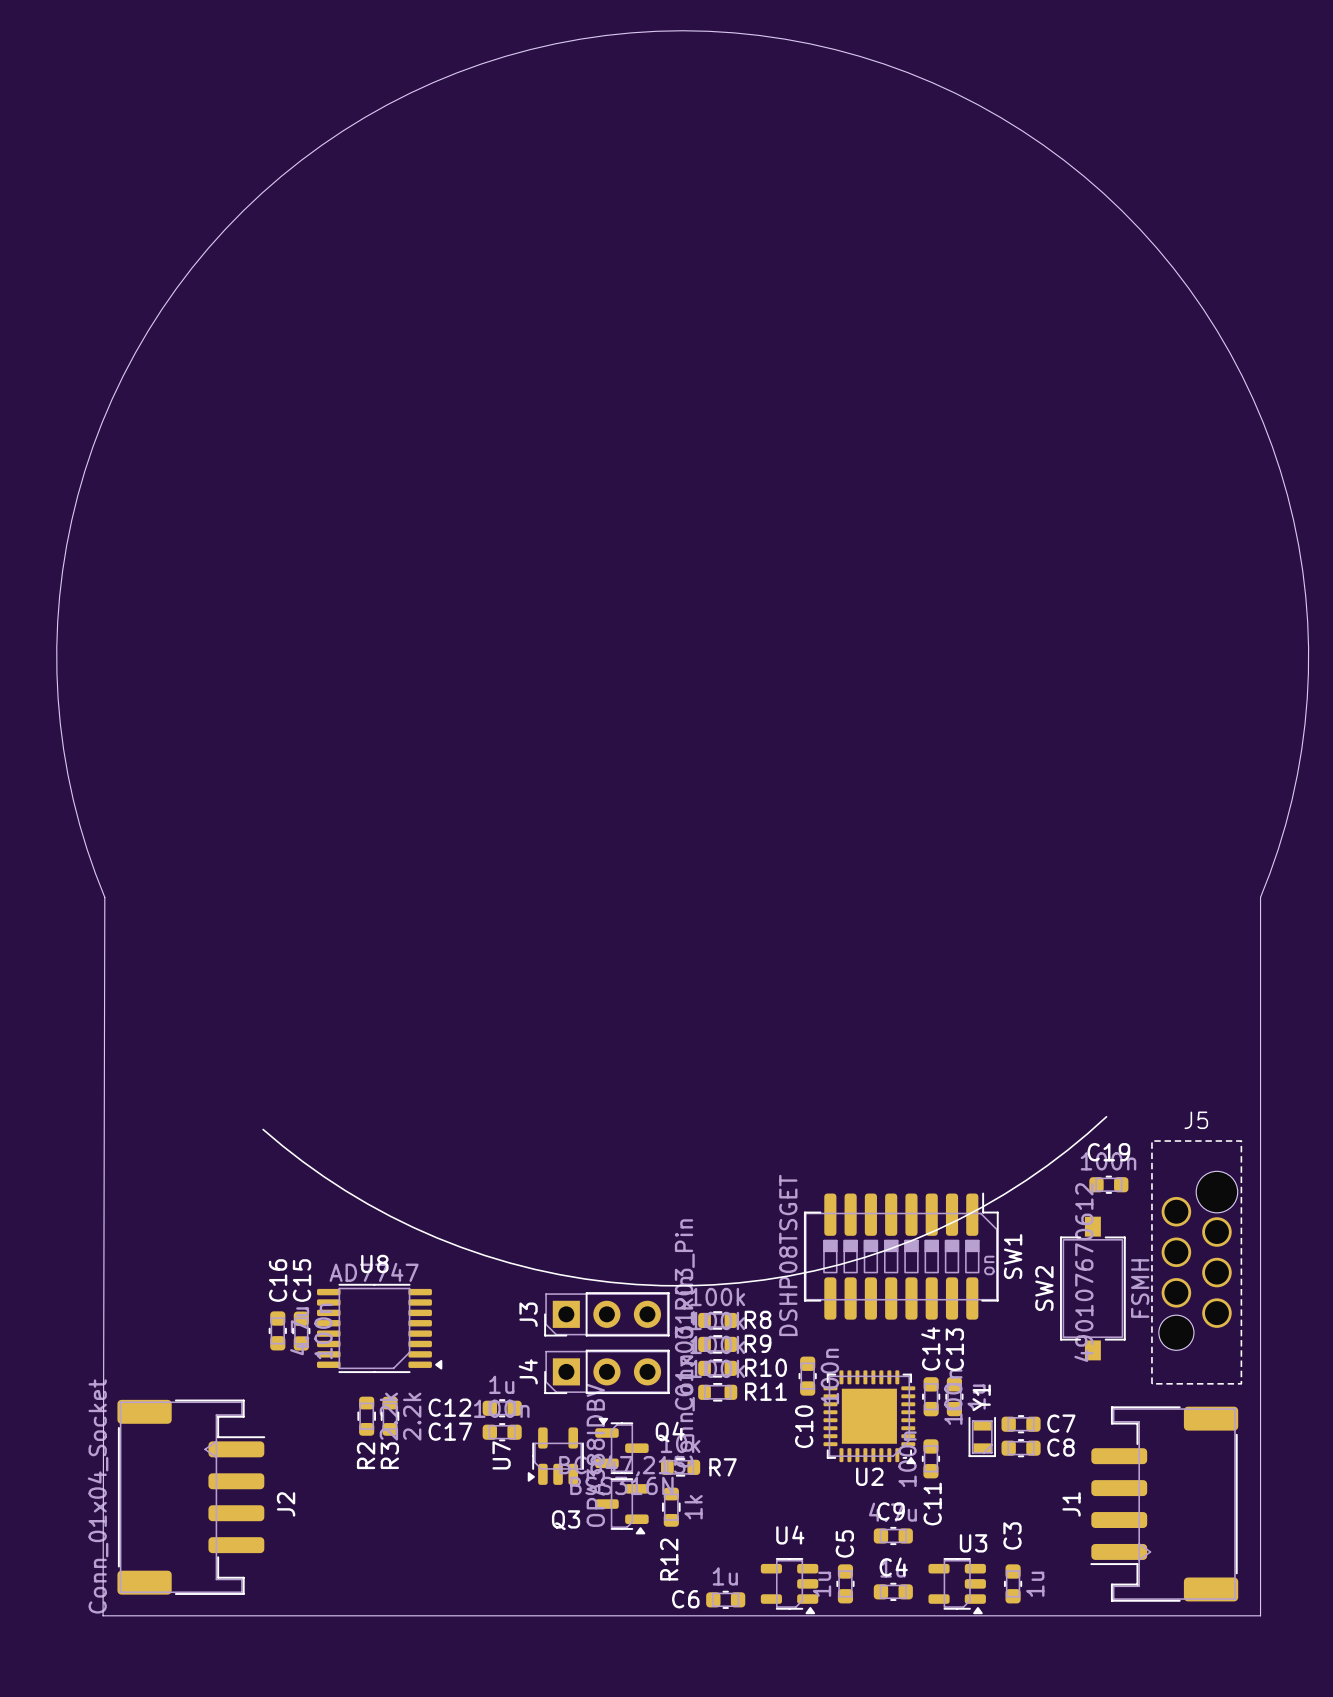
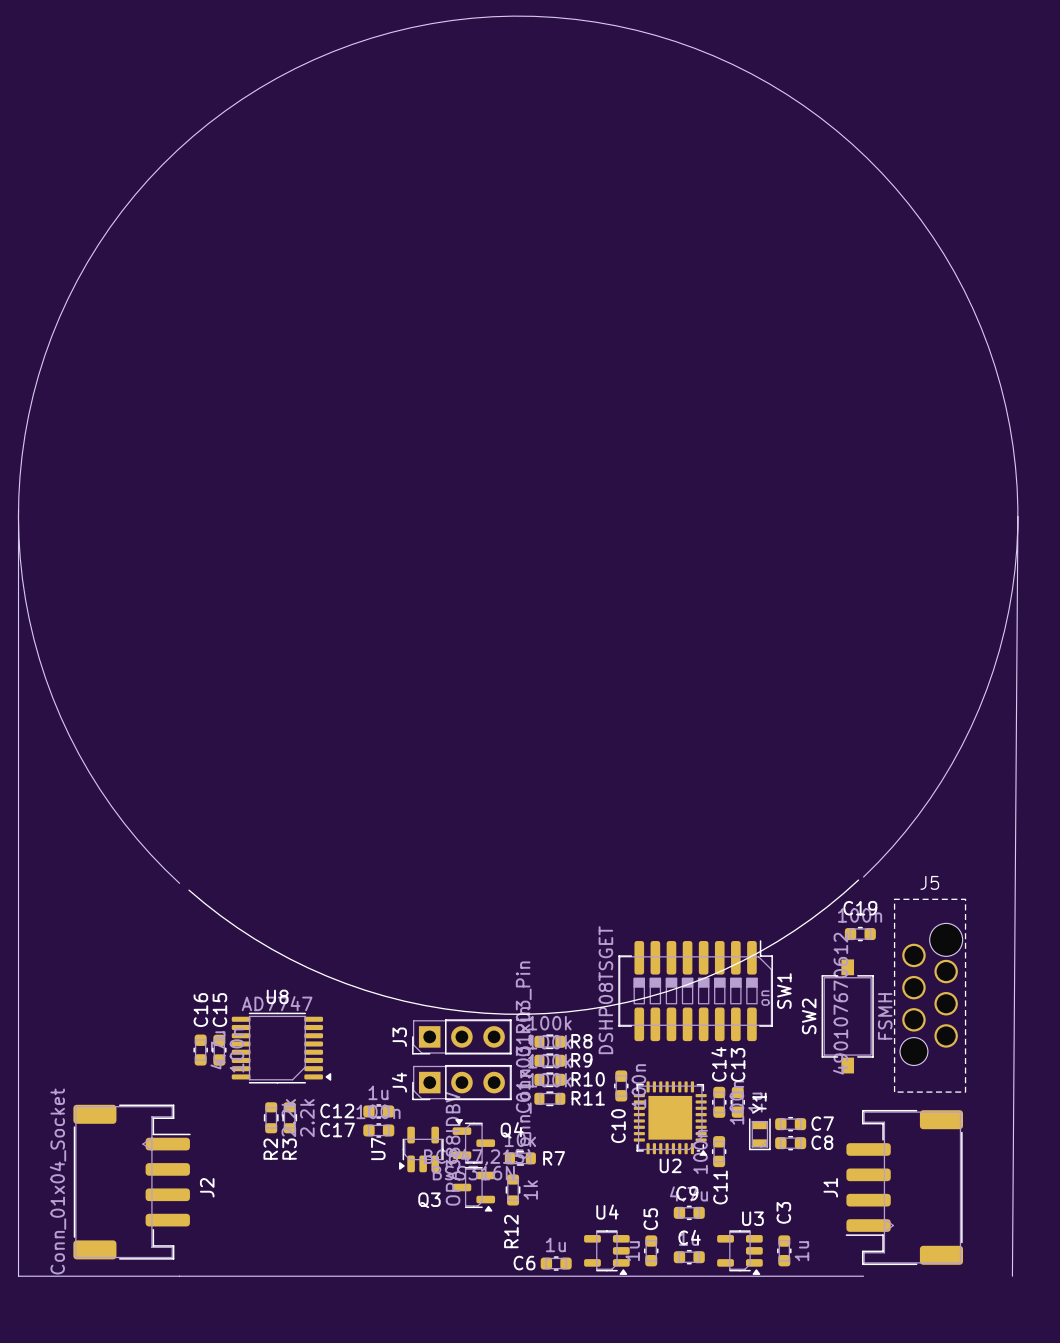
board edge: none -> (1017, 516) (1012, 1276)
board edge: none -> (863, 877) (892, 847) (918, 815) (951, 763) (970, 727) (986, 689) (1004, 630) (1015, 569) (1017, 528) (1017, 487) (1013, 446) (1005, 406) (995, 366) (981, 327) (964, 290) (944, 254) (921, 220) (895, 188) (867, 158) (836, 130) (786, 94) (751, 73) (713, 56) (655, 35) (615, 25) (575, 19) (513, 16) (472, 18) (431, 23) (391, 32) (352, 44) (313, 59) (277, 78) (225, 111) (192, 136) (162, 164) (122, 211) (98, 244) (77, 280) (51, 336) (33, 395) (24, 435) (20, 476) (18, 517) (20, 558) (29, 619) (39, 659) (52, 698) (69, 735) (89, 771) (123, 822) (150, 854) (179, 883)
board edge: (103, 1615) (104, 897) (87, 849) (73, 799) (63, 749) (56, 673) (57, 621) (66, 545) (77, 495) (93, 446) (112, 399) (135, 353) (161, 309) (192, 268) (243, 210) (281, 176) (321, 145) (364, 117) (410, 93) (457, 72) (505, 56) (555, 43) (605, 35) (682, 30) (733, 32) (784, 39) (834, 49) (884, 64) (931, 82) (978, 104) (1022, 130) (1064, 160) (1103, 193) (1139, 229) (1173, 268) (1203, 309) (1230, 353) (1253, 399) (1272, 446) (1287, 495) (1302, 570) (1307, 621) (1308, 673) (1301, 749) (1292, 799) (1278, 849) (1260, 897) (1260, 1615) (1112, 1615) -> (61, 1276) (18, 1276) (18, 509)

